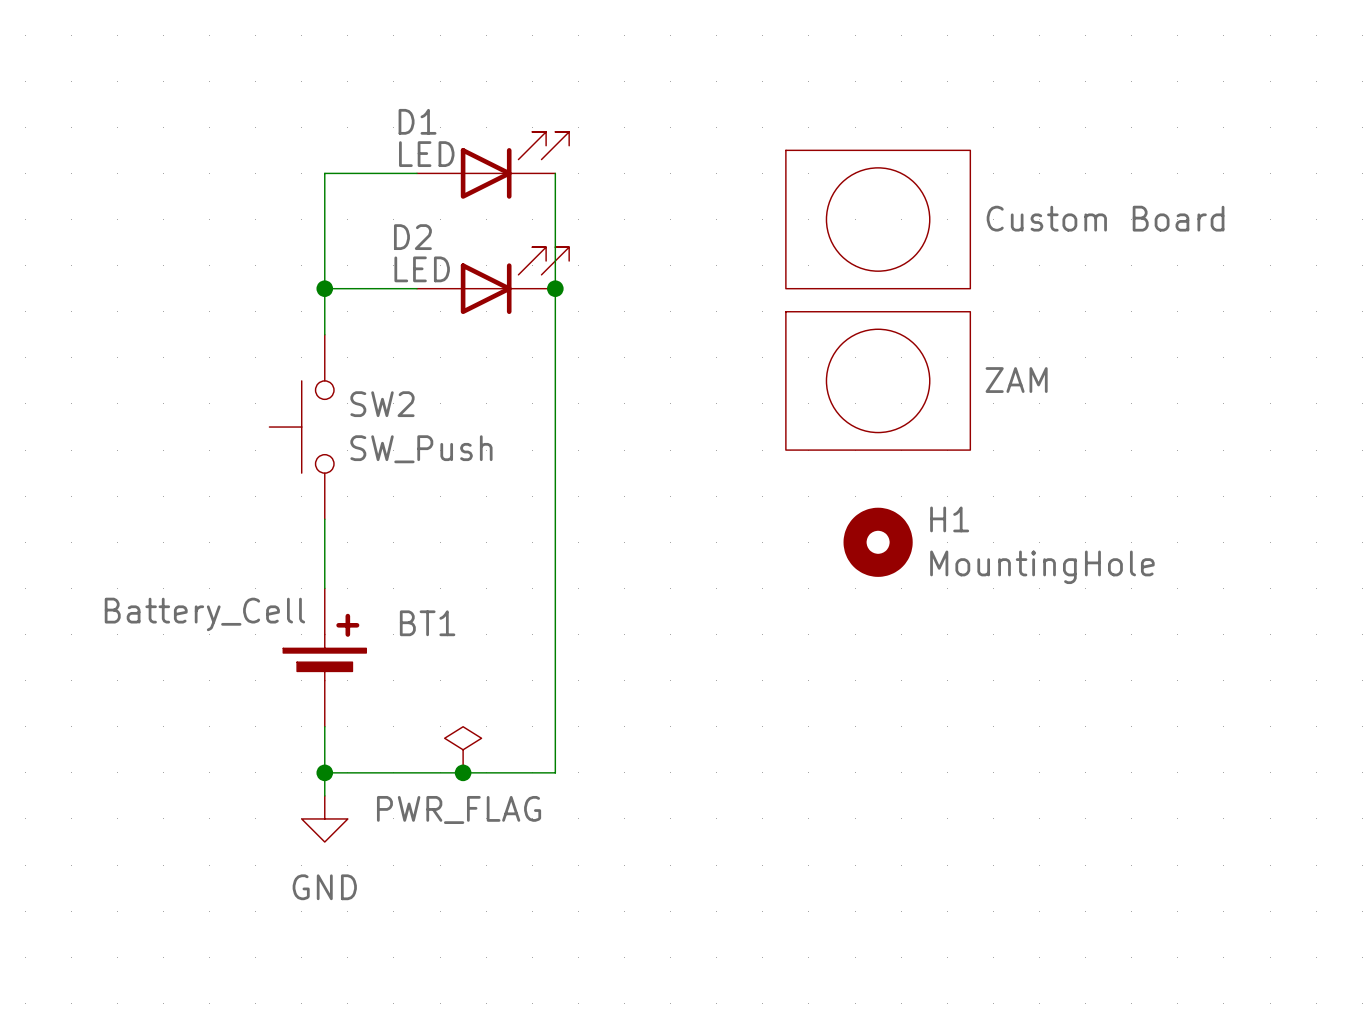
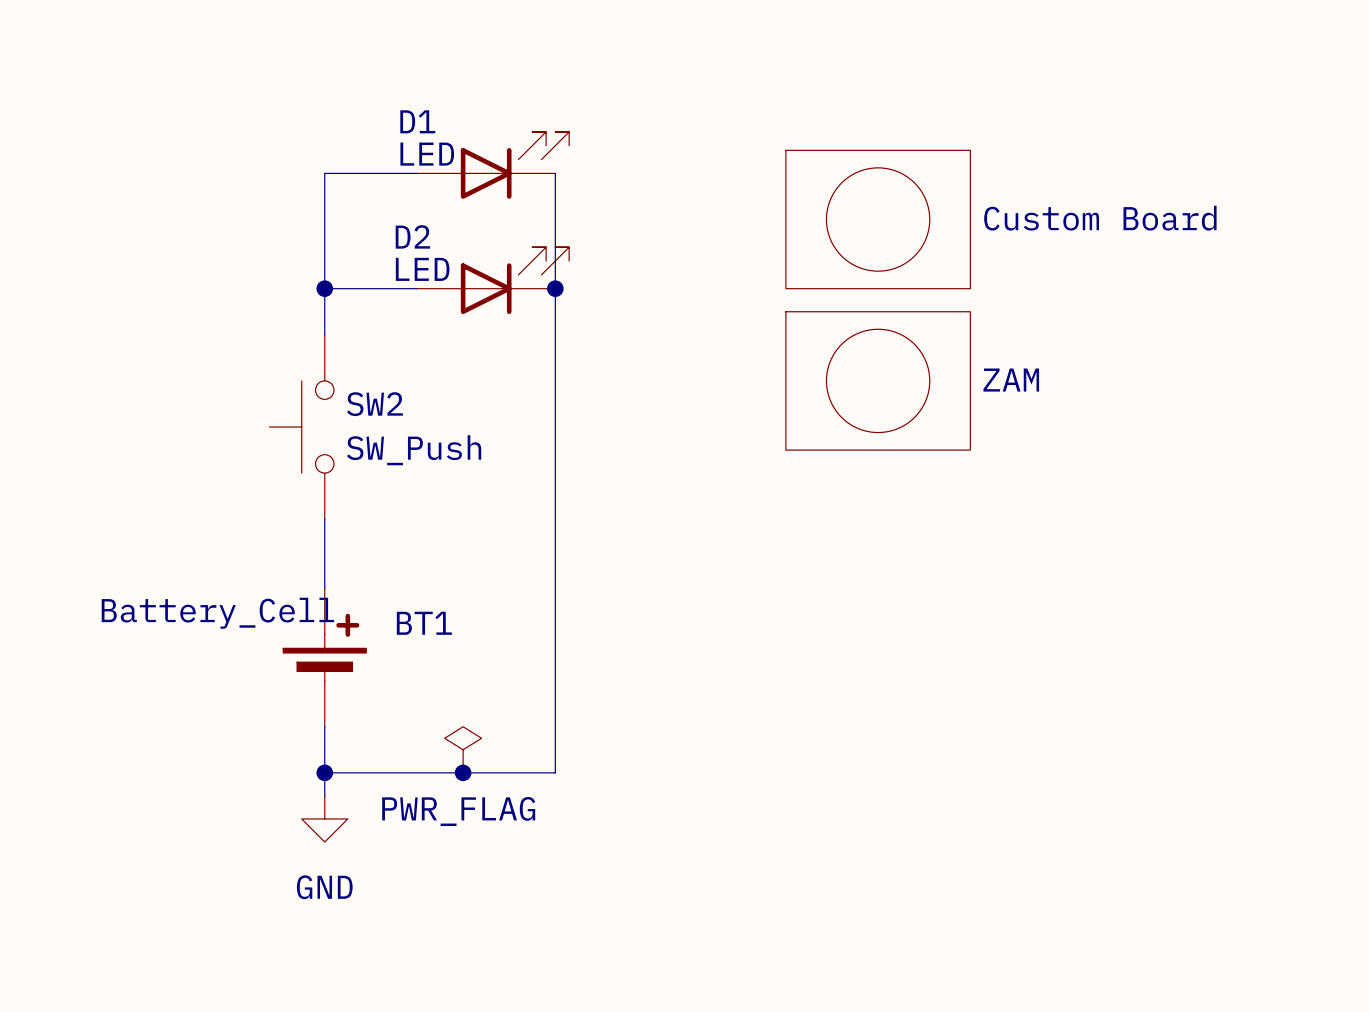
H1: MountingHole (878, 542) -> none

